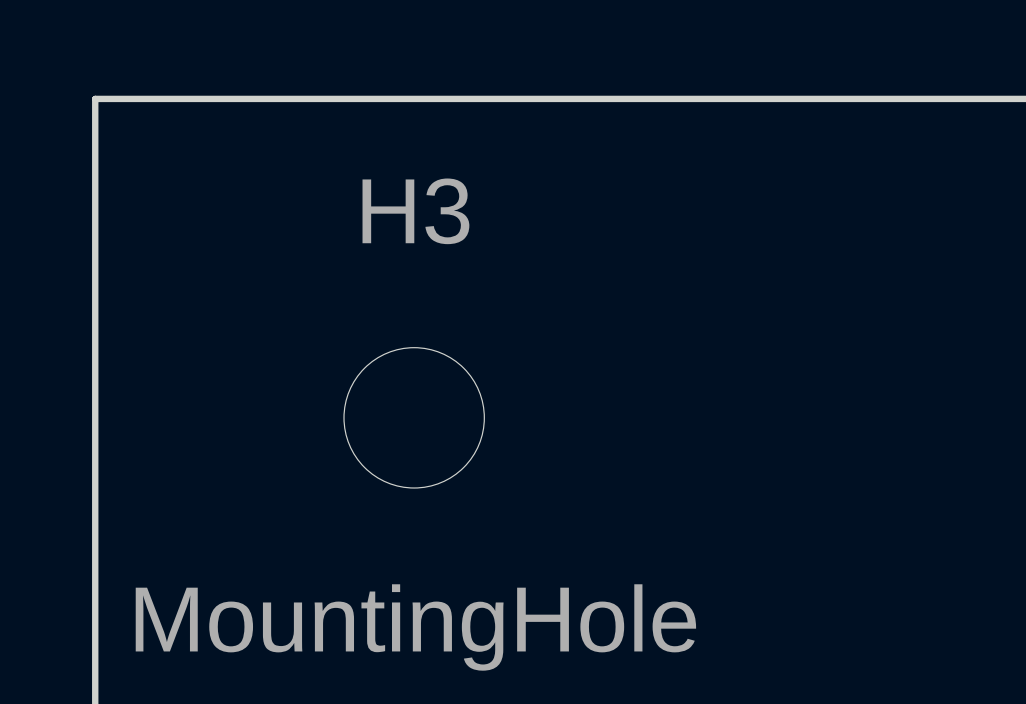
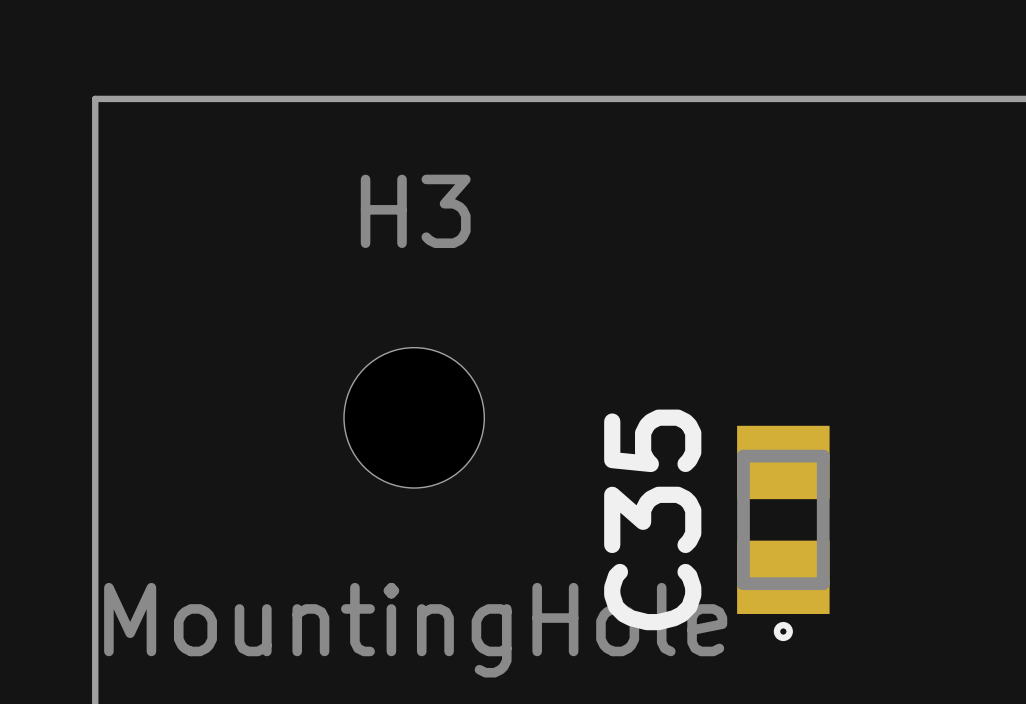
C35: none -> (783, 533)

